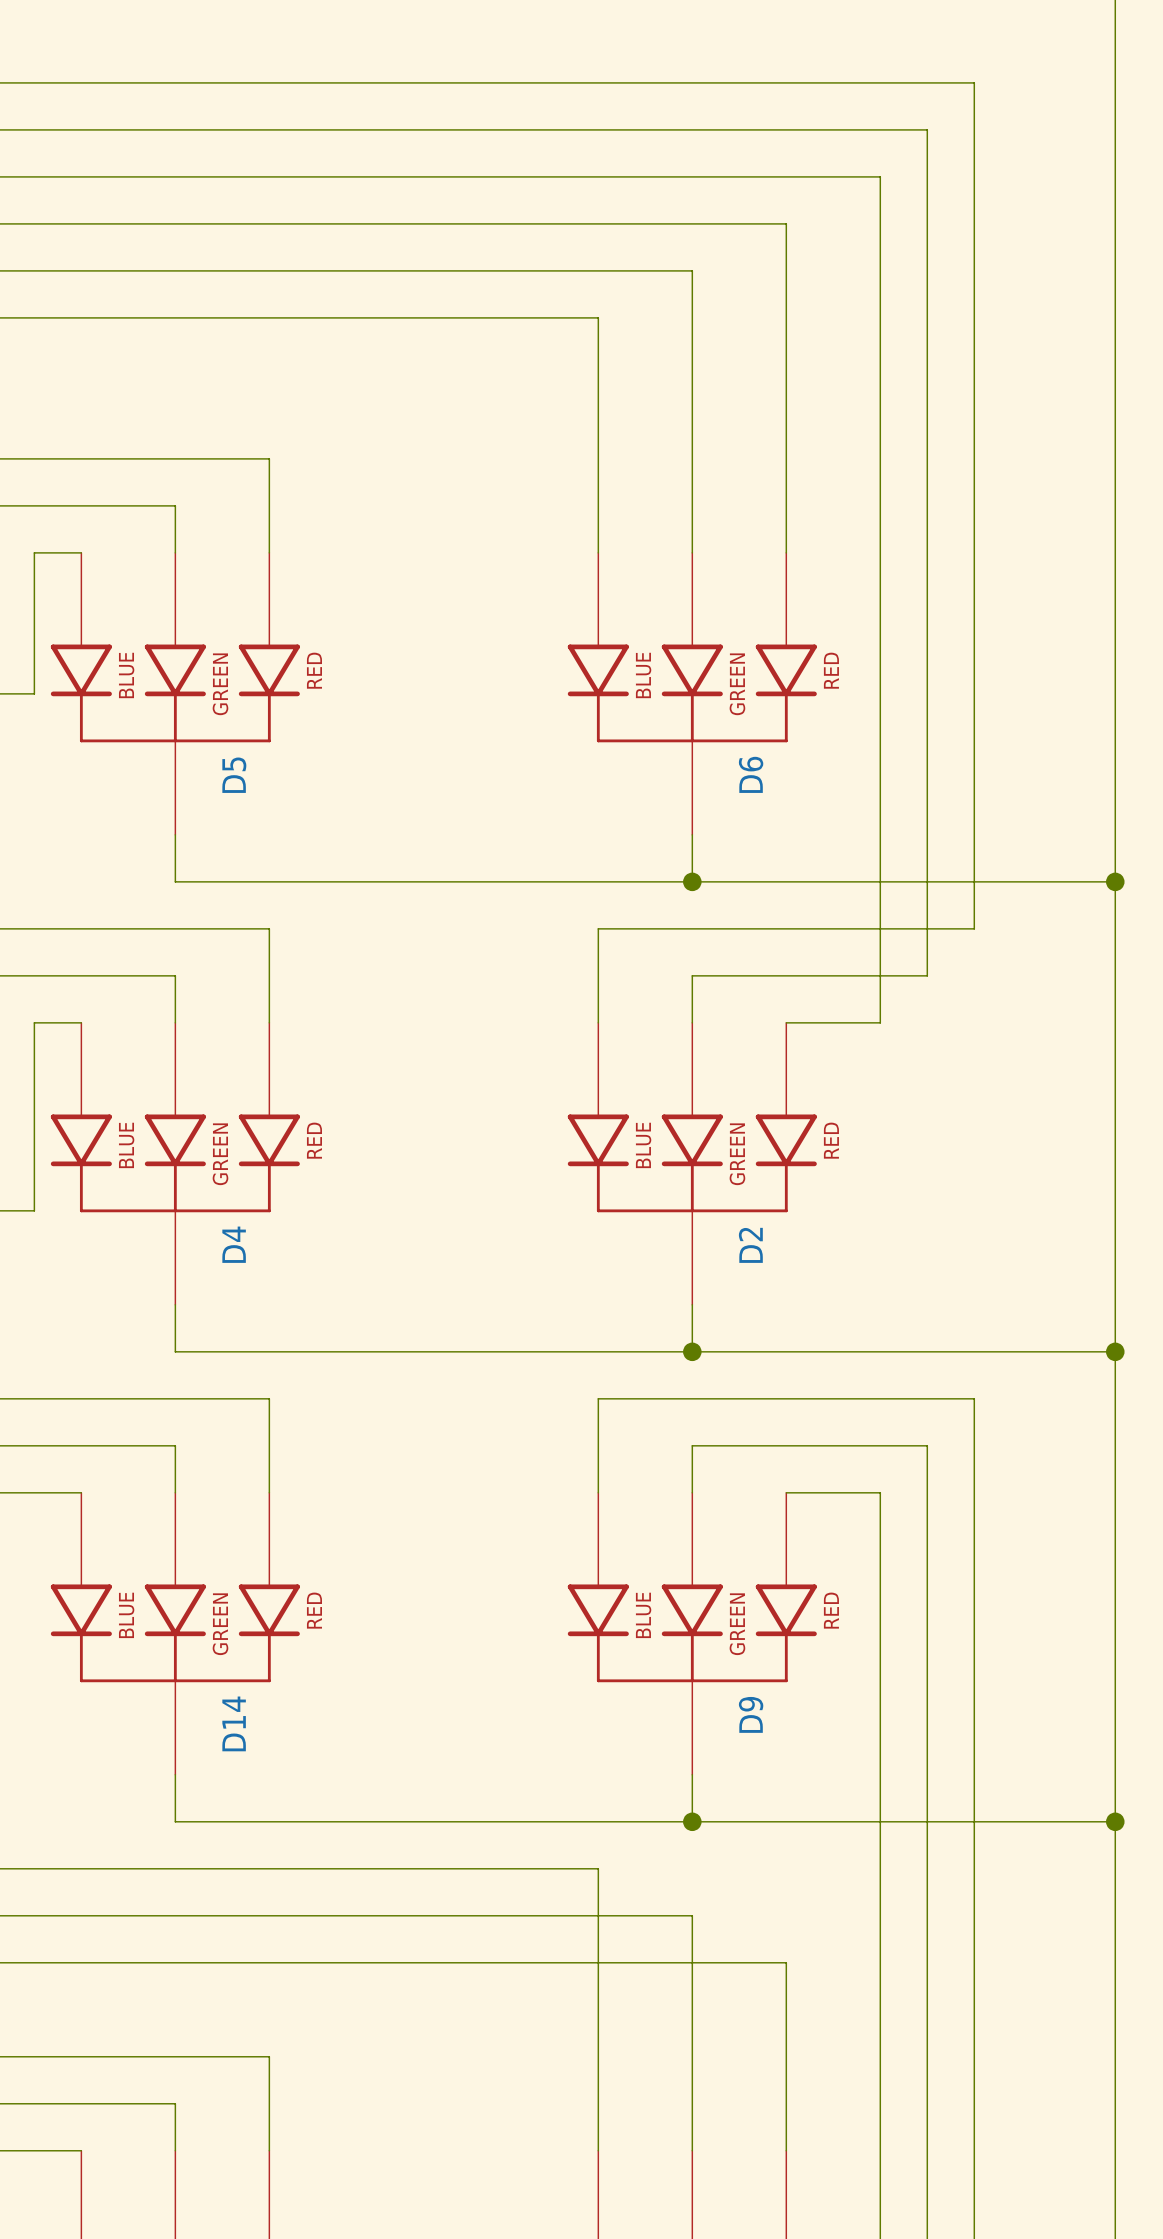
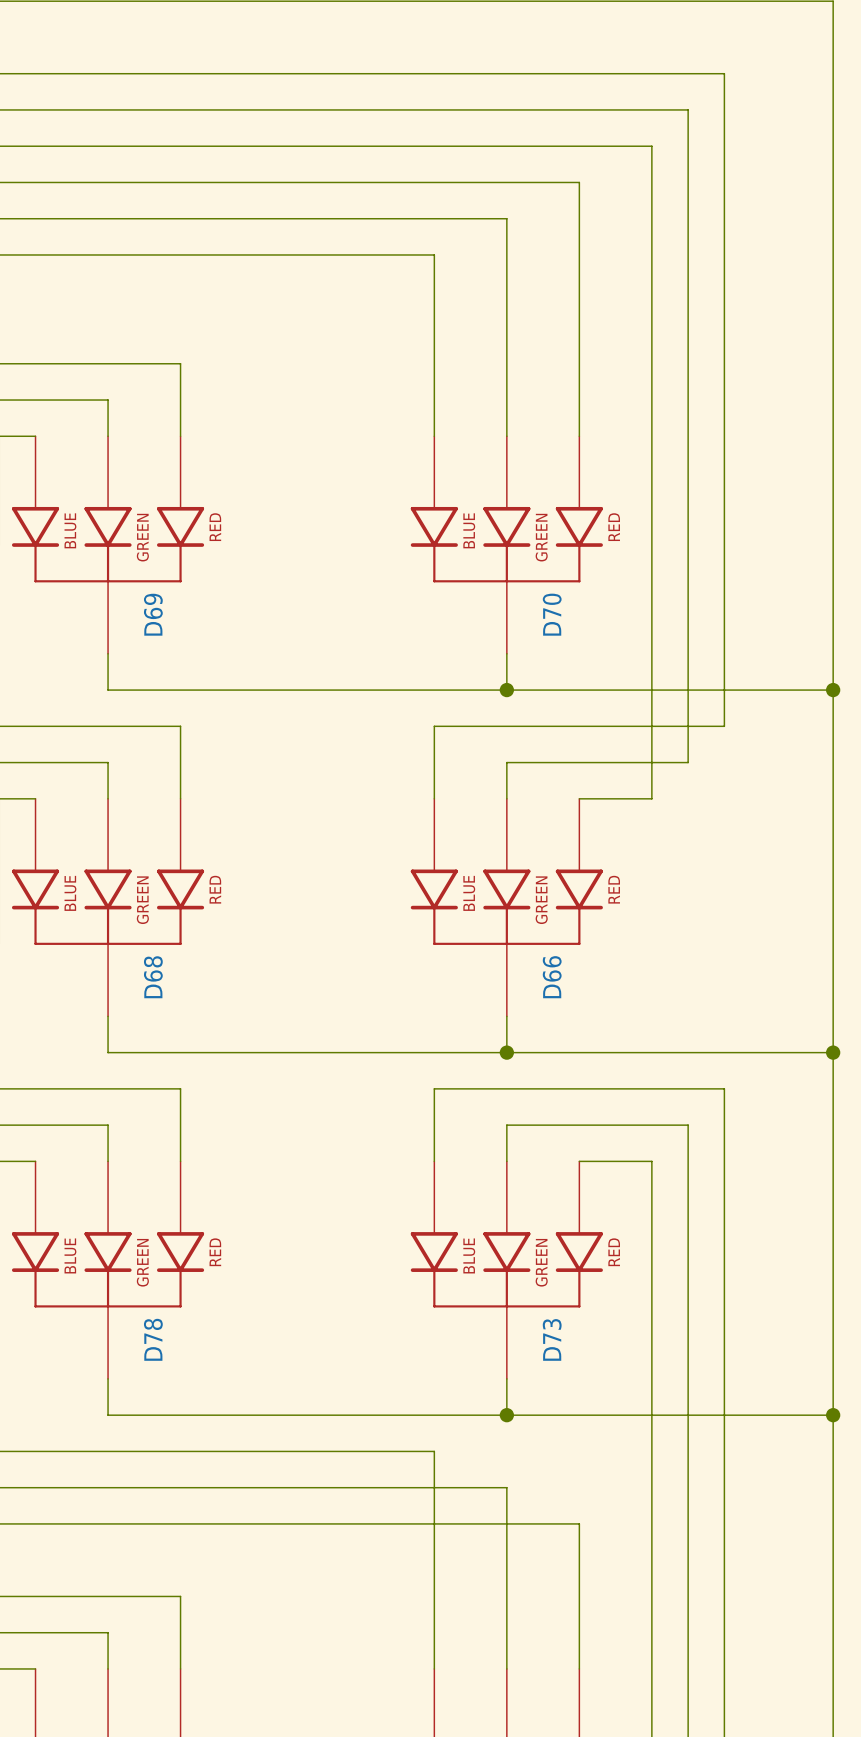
D6 name: D6 (751, 774) -> D70 (552, 614)
D5 name: D5 (234, 775) -> D69 (153, 614)
D4 name: D4 (234, 1244) -> D68 (153, 977)
D2 name: D2 (750, 1245) -> D66 (552, 977)
D9 name: D9 (751, 1714) -> D73 (552, 1339)
D14 name: D14 (234, 1723) -> D78 (153, 1339)

